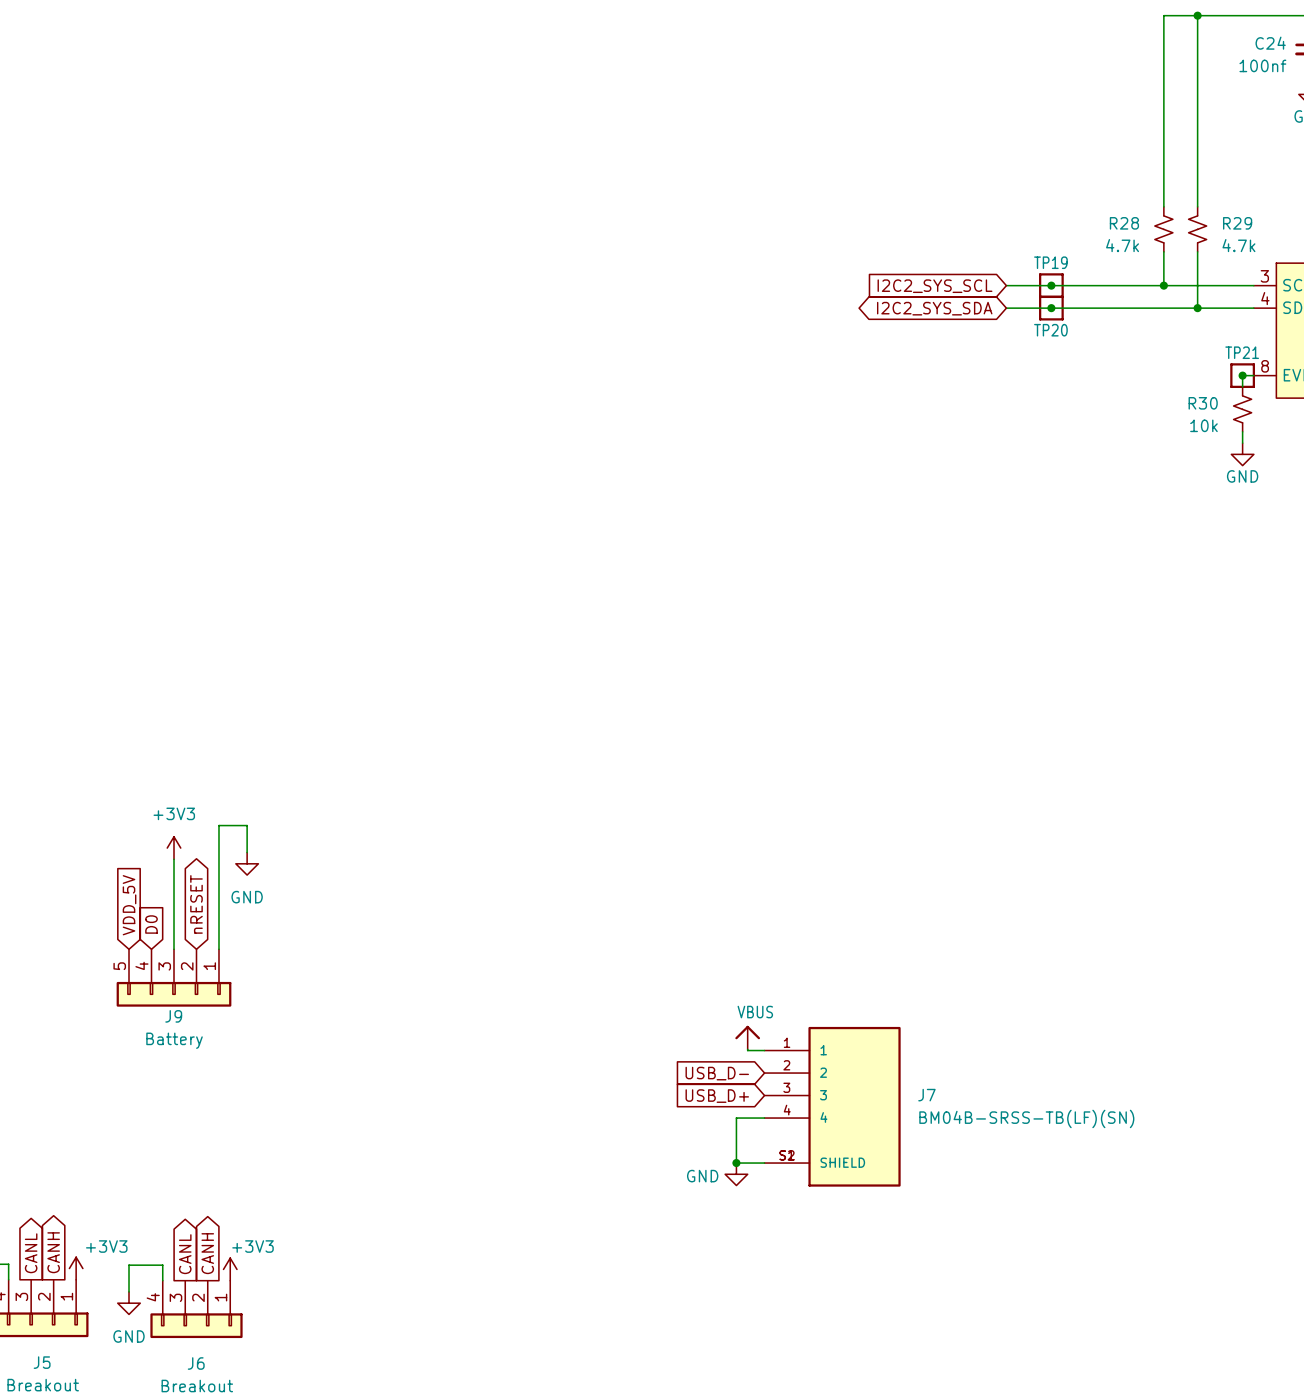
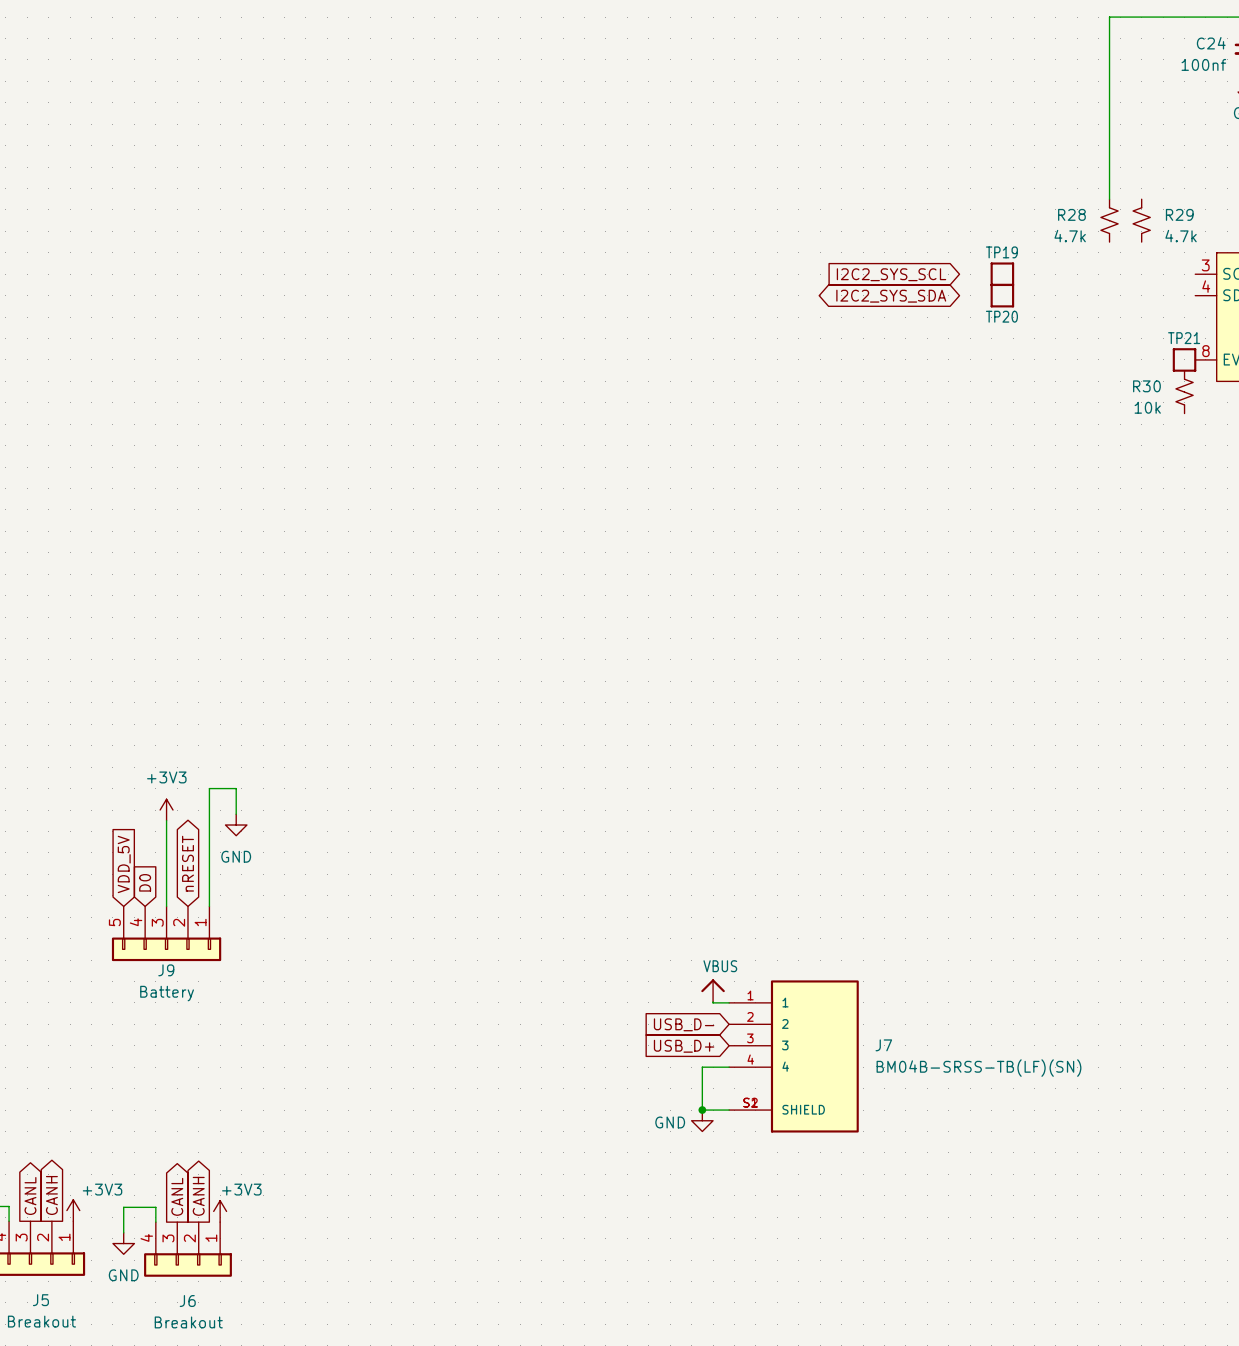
wire: (1197, 15) (1197, 206) -> none
junction: (1197, 15) -> none
wire: (1163, 251) (1163, 285) -> none
wire: (1197, 251) (1197, 308) -> none
wire: (1006, 285) (1253, 285) -> none
junction: (1051, 285) -> none
junction: (1163, 285) -> none
wire: (1006, 308) (1253, 308) -> none
junction: (1051, 308) -> none
junction: (1197, 308) -> none
junction: (1242, 375) -> none
wire: (1253, 375) (1242, 375) (1242, 386) -> none
wire: (1242, 431) (1242, 443) -> none
power symbol: GND (1242, 454) -> none

